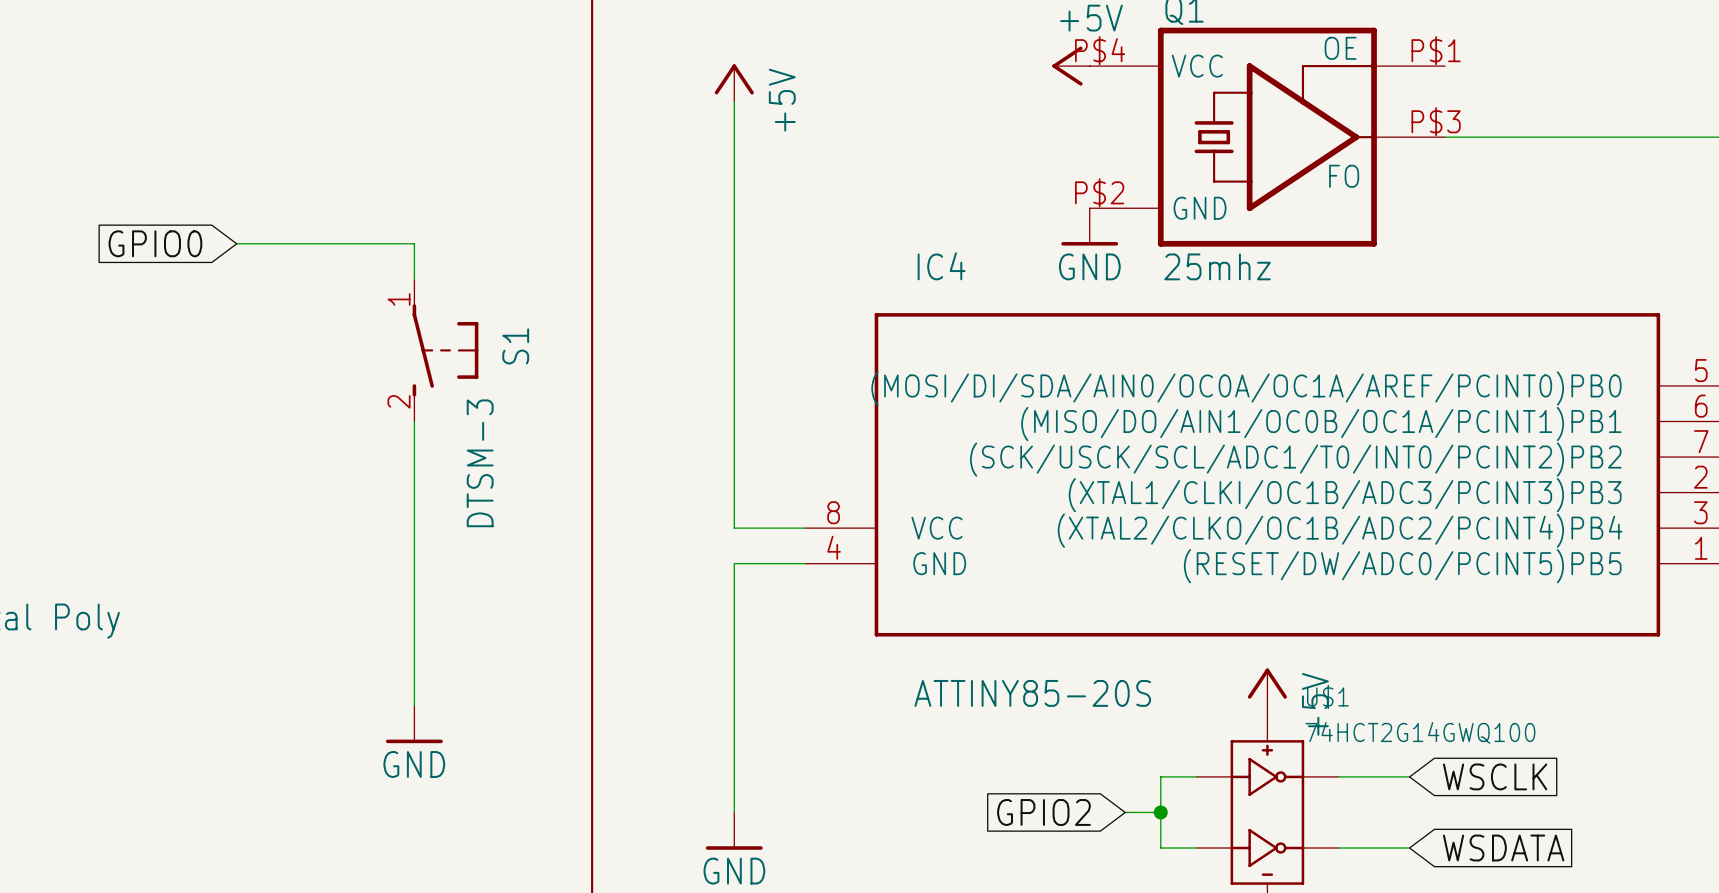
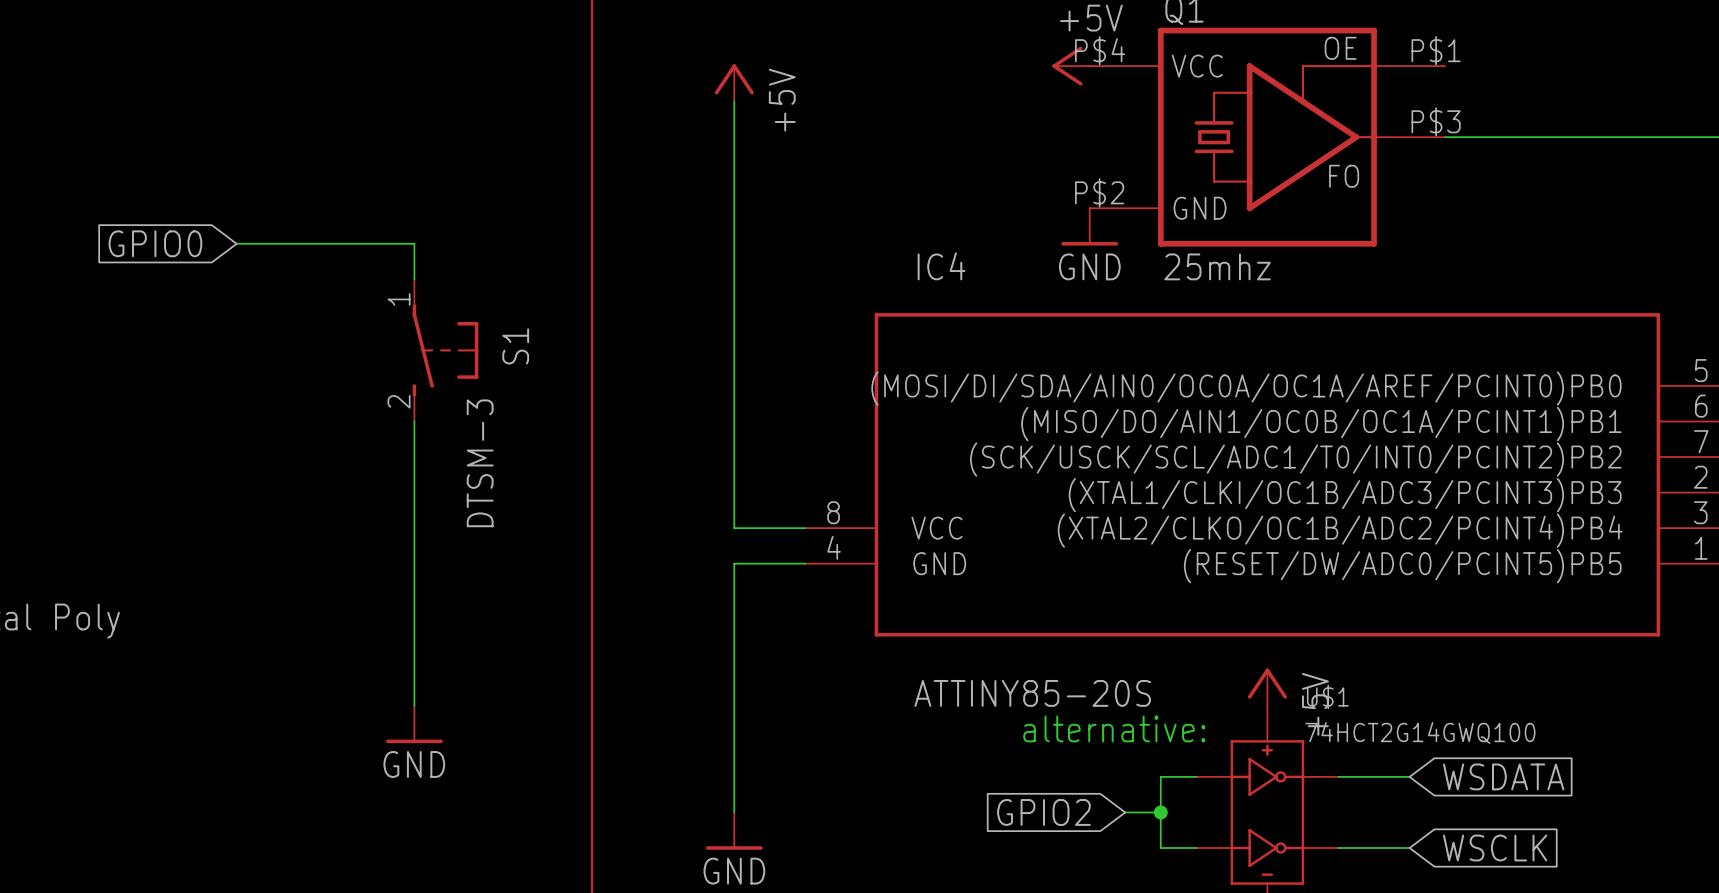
text: none -> alternative: (1114, 728)
global label: WSCLK (1495, 776) -> WSDATA (1503, 776)
global label: WSDATA (1503, 848) -> WSCLK (1495, 848)

